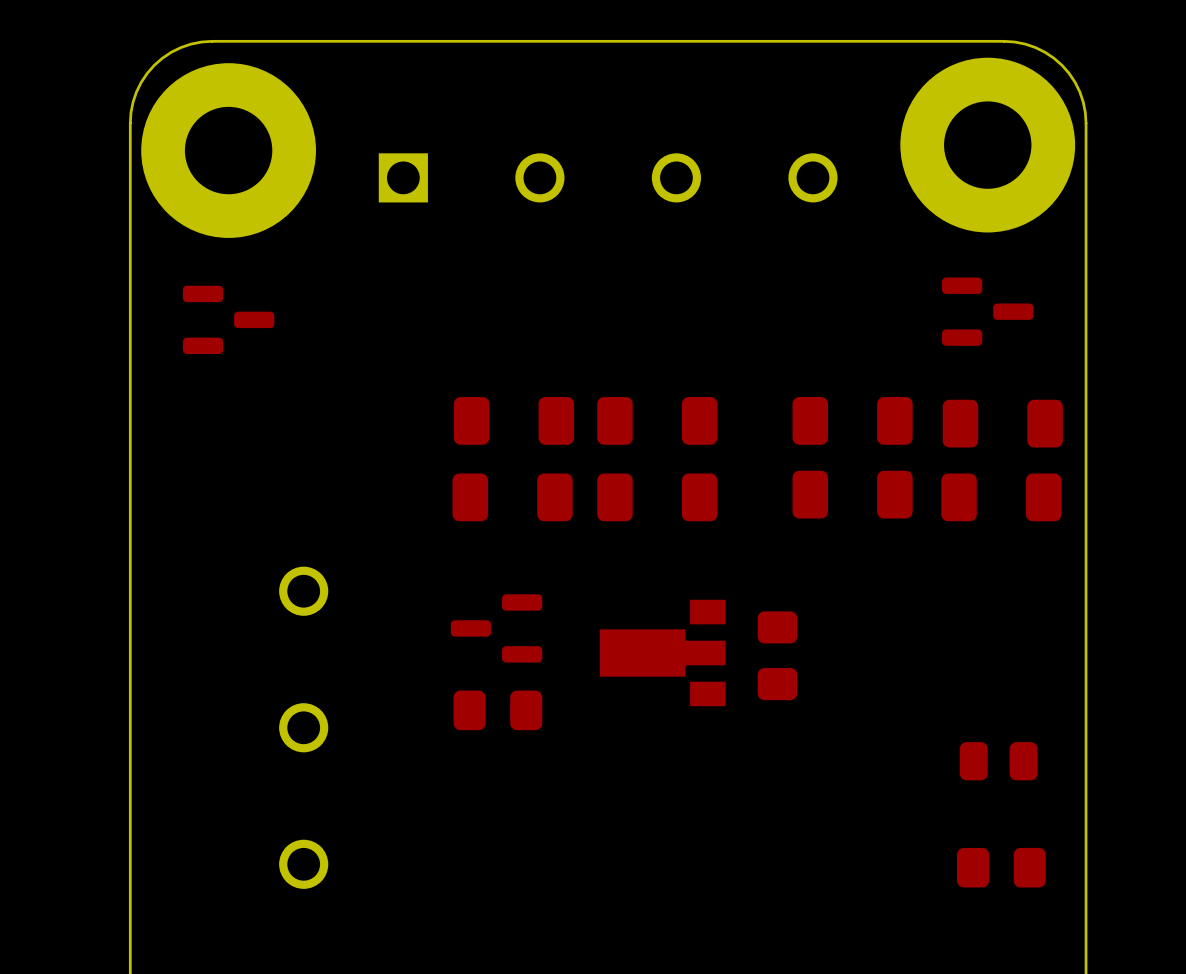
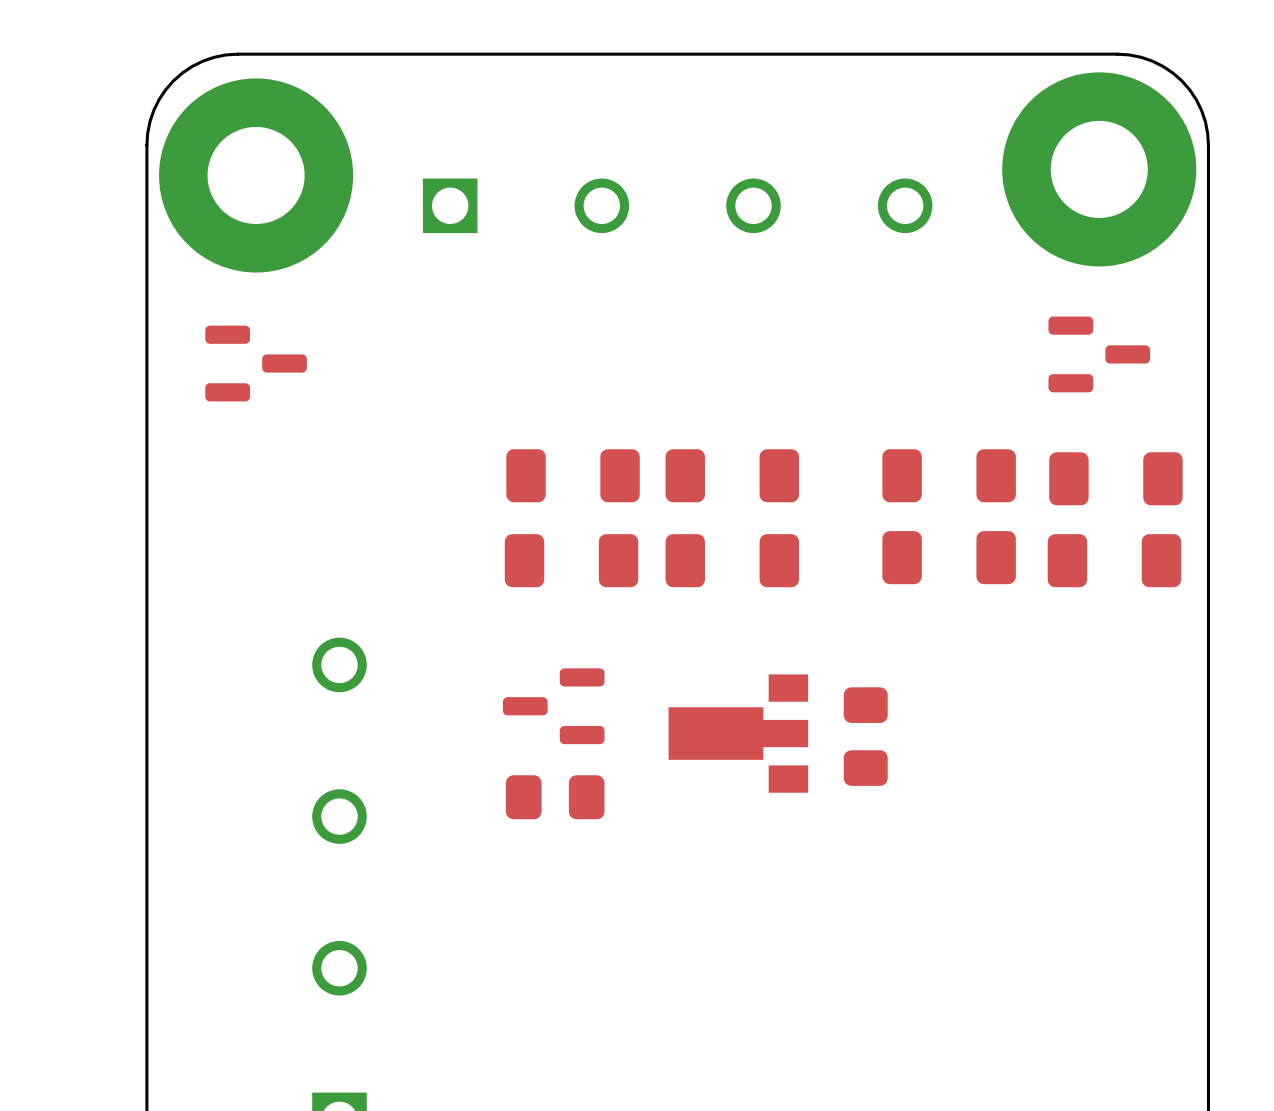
part: (998, 761) -> none
part: (1001, 867) -> none

